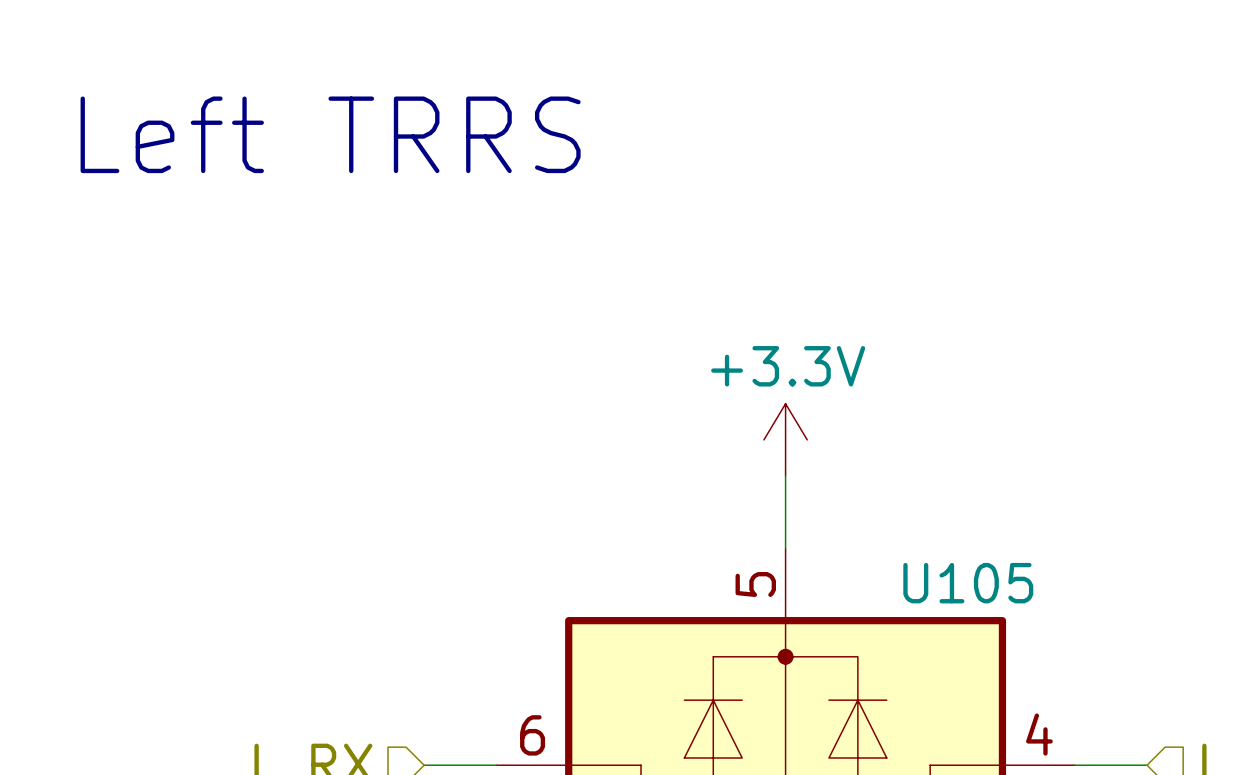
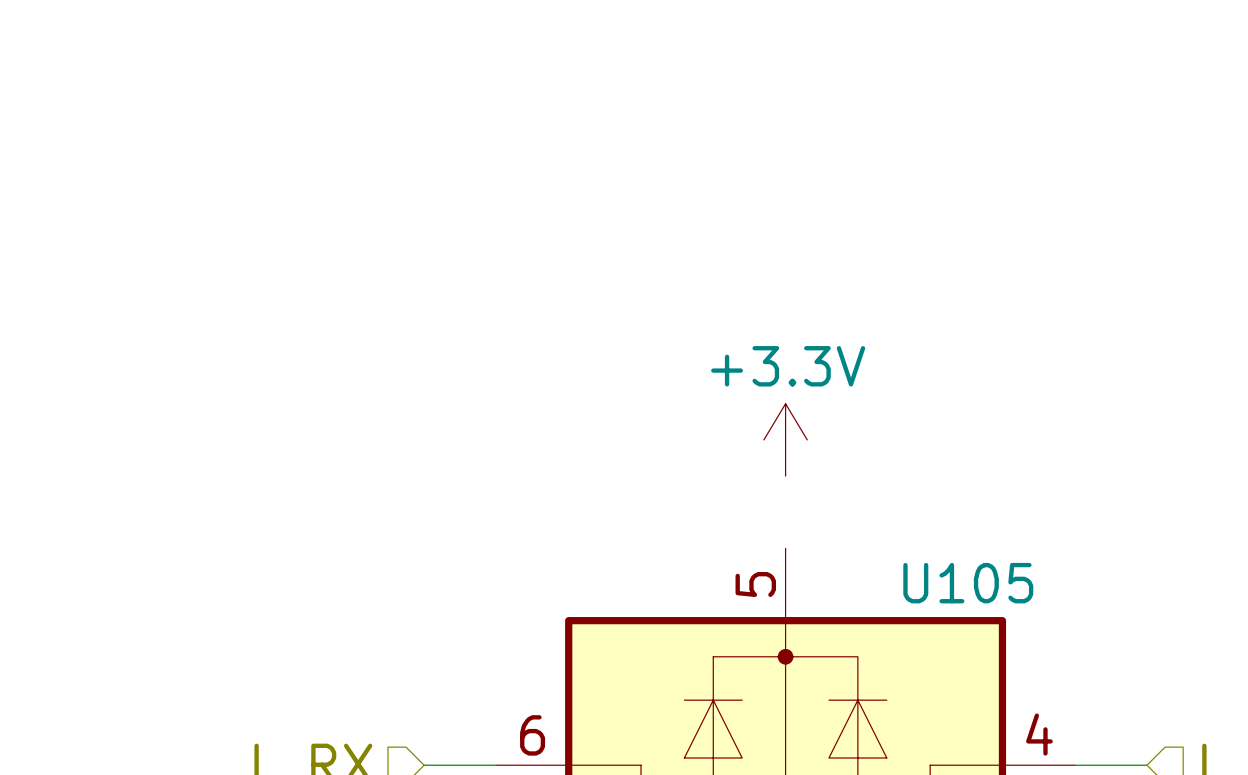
text: Left TRRS (330, 134) -> none
wire: (785, 476) (785, 548) -> none

